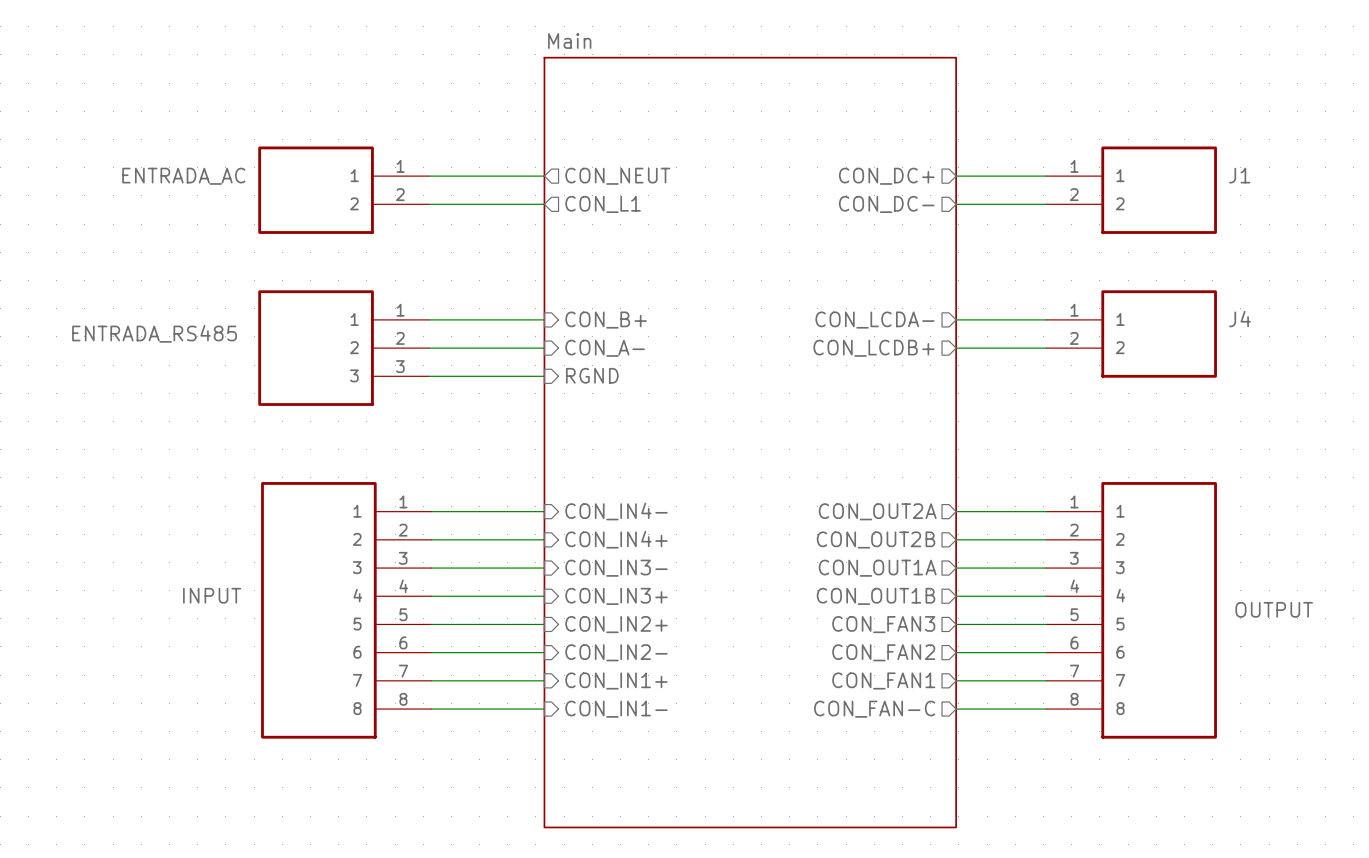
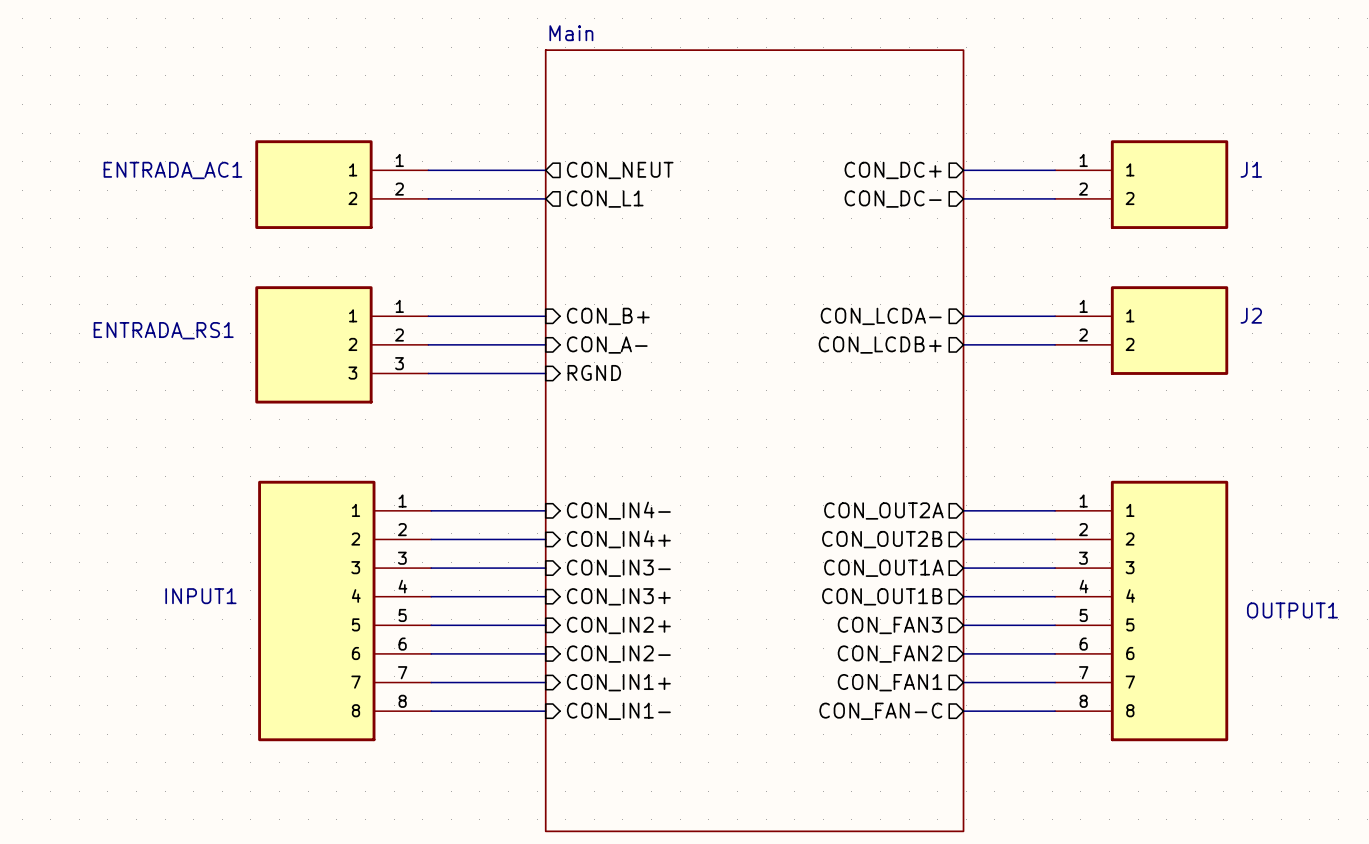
ENTRADA_AC name: ENTRADA_AC (183, 176) -> ENTRADA_AC1 (172, 170)
J4 name: J4 (1240, 319) -> J2 (1251, 315)
ENTRADA_RS485 name: ENTRADA_RS485 (154, 333) -> ENTRADA_RS1 (163, 330)
INPUT name: INPUT (212, 595) -> INPUT1 (200, 596)
OUTPUT name: OUTPUT (1274, 609) -> OUTPUT1 (1292, 610)

